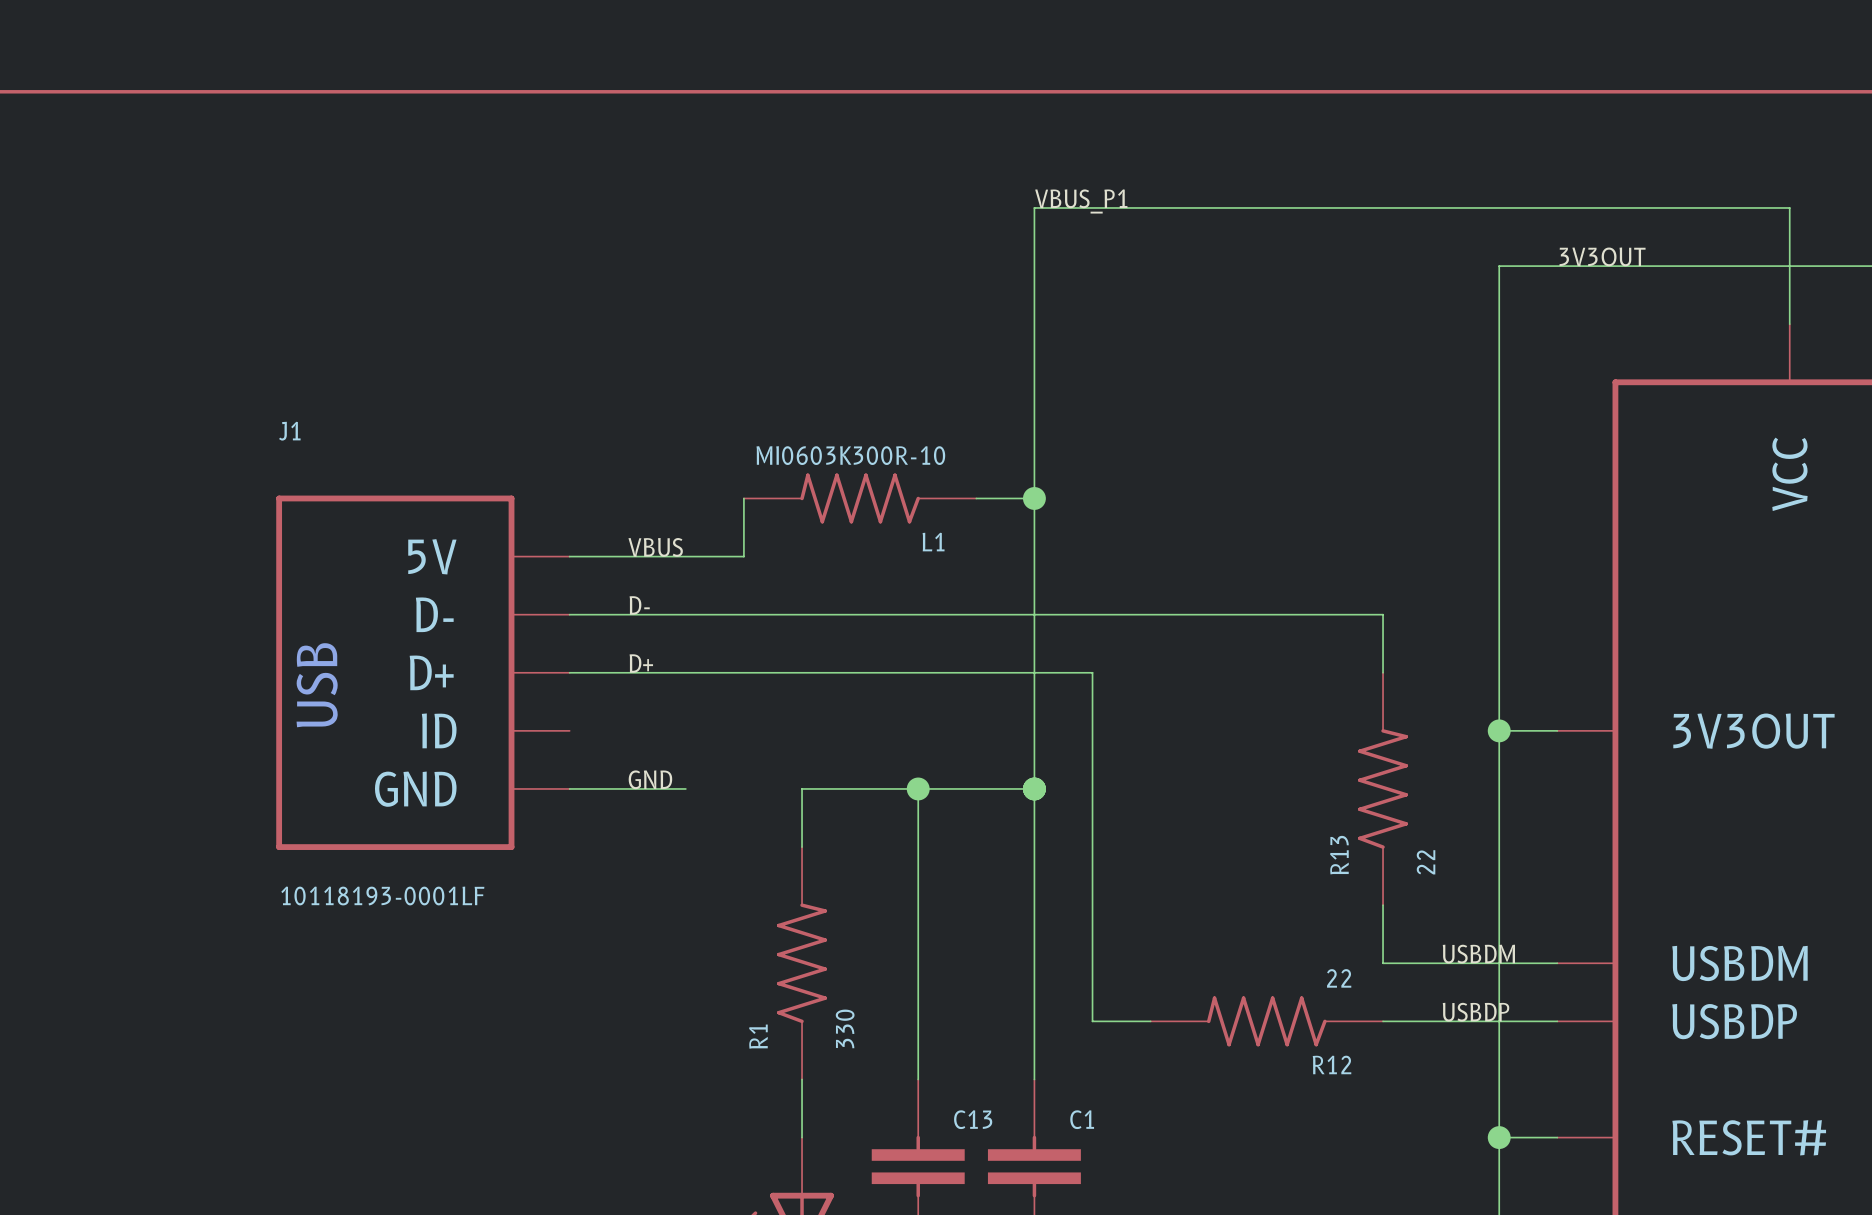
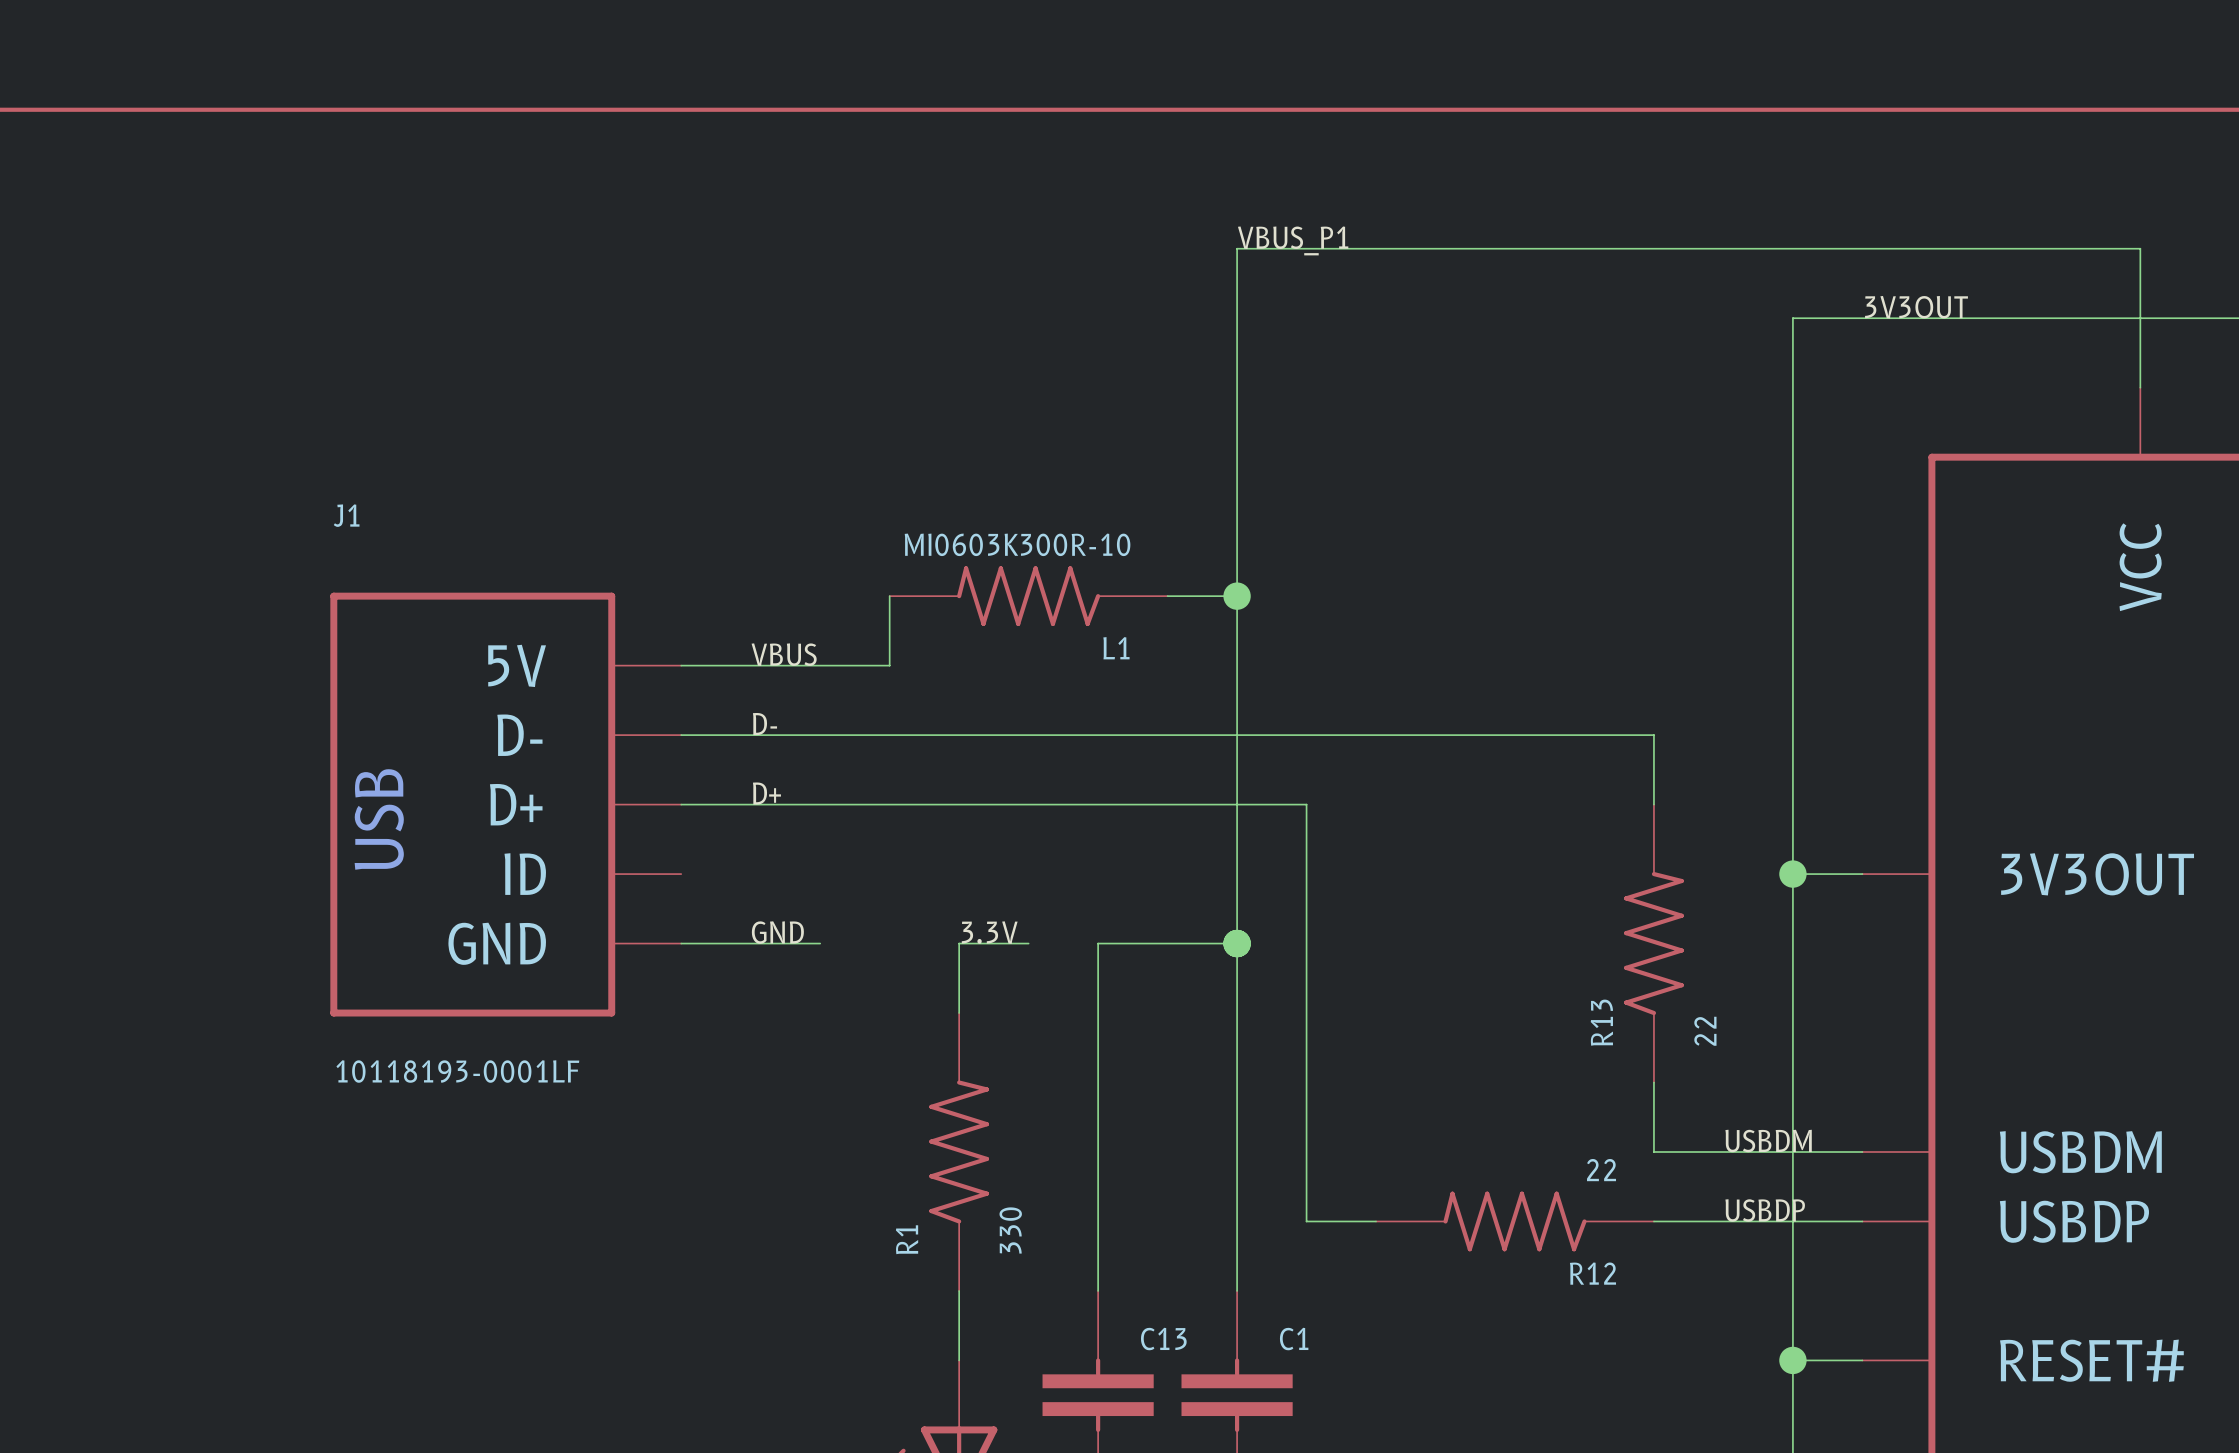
label: none -> 3.3V (989, 932)
wire: (860, 788) (918, 788) -> none
junction: (918, 788) -> none

